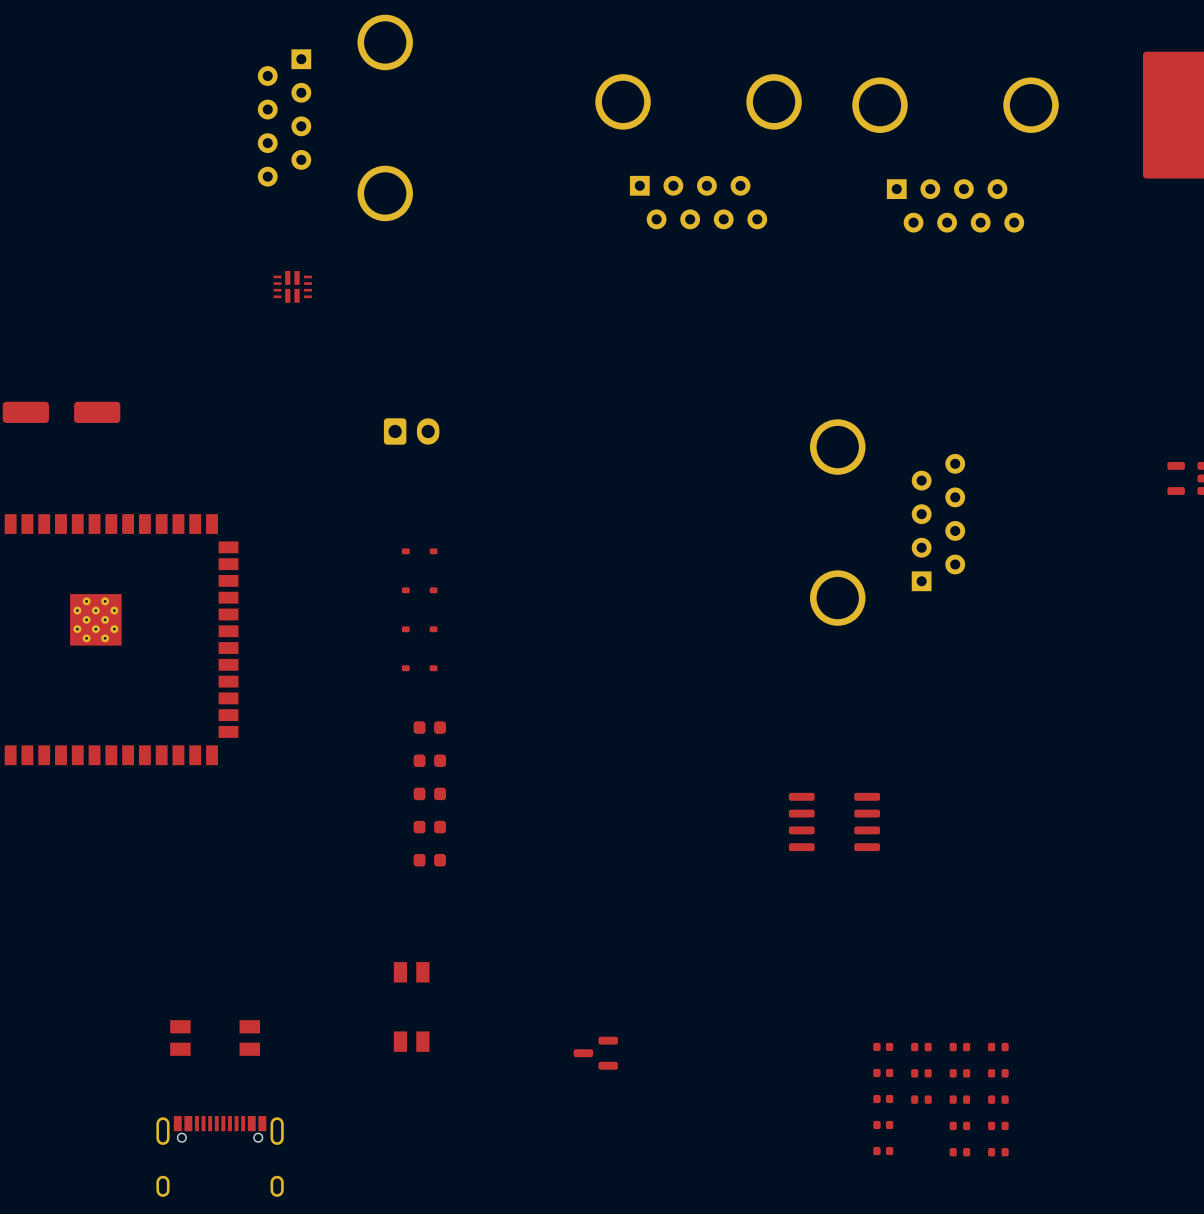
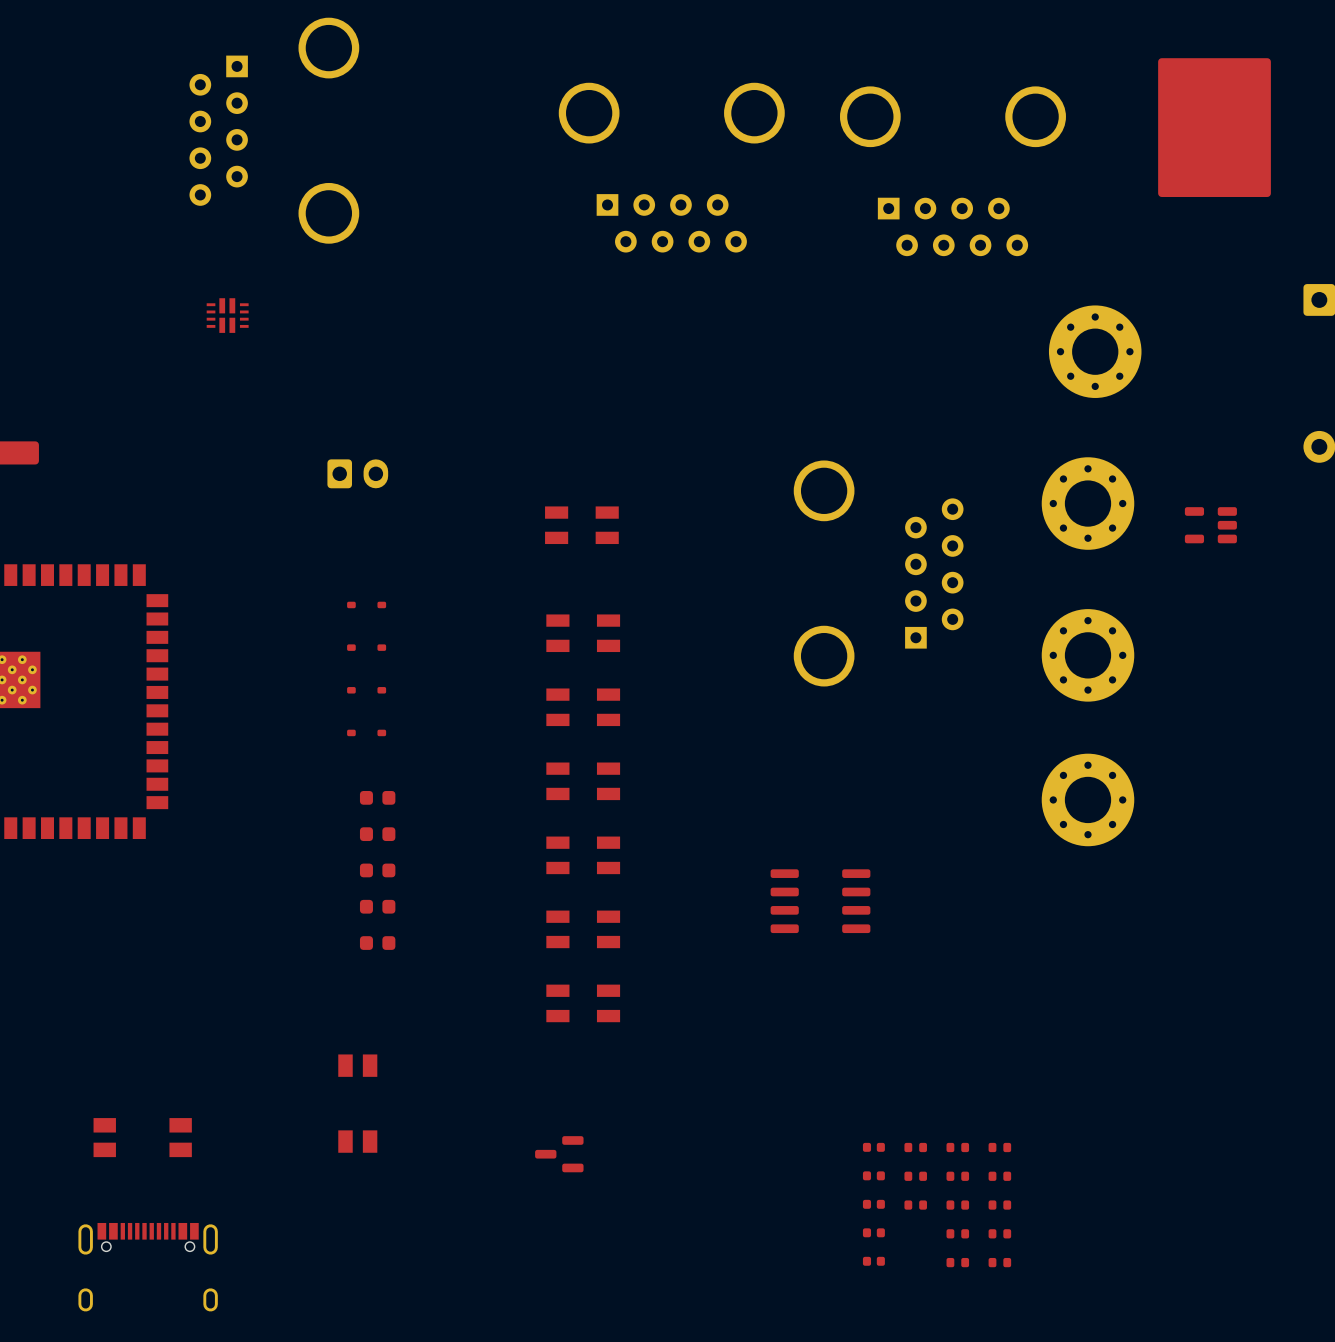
part: none -> (1095, 351)
part: none -> (1088, 503)
part: none -> (581, 525)
part: none -> (583, 633)
part: none -> (1088, 655)
part: none -> (583, 707)
part: none -> (583, 781)
part: none -> (1088, 799)
part: none -> (583, 855)
part: none -> (583, 929)
part: none -> (583, 1003)

